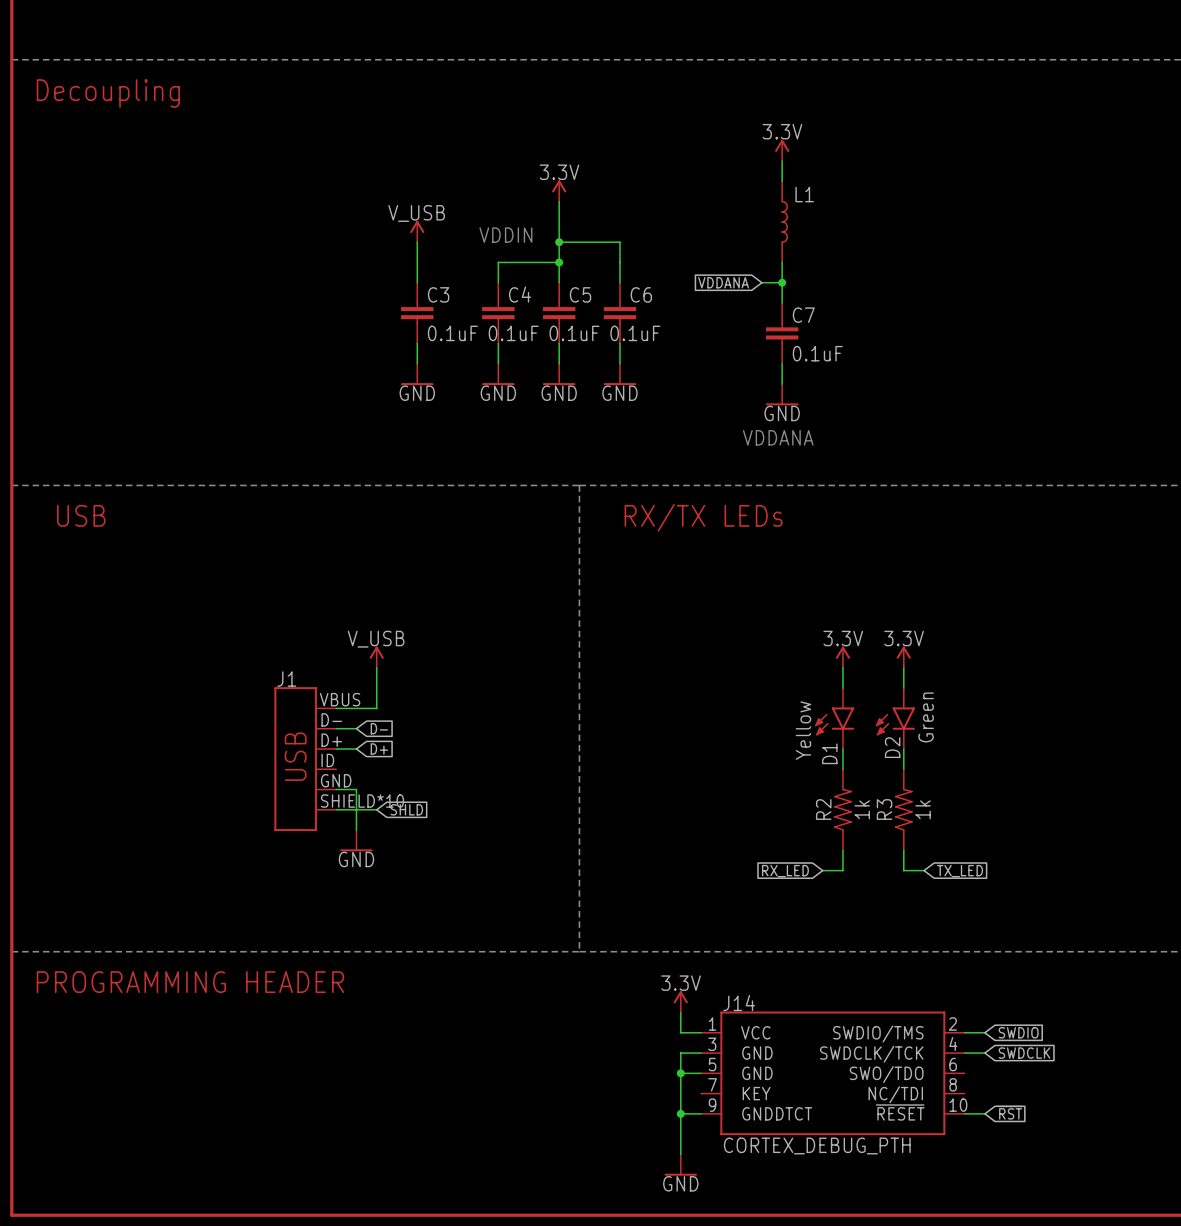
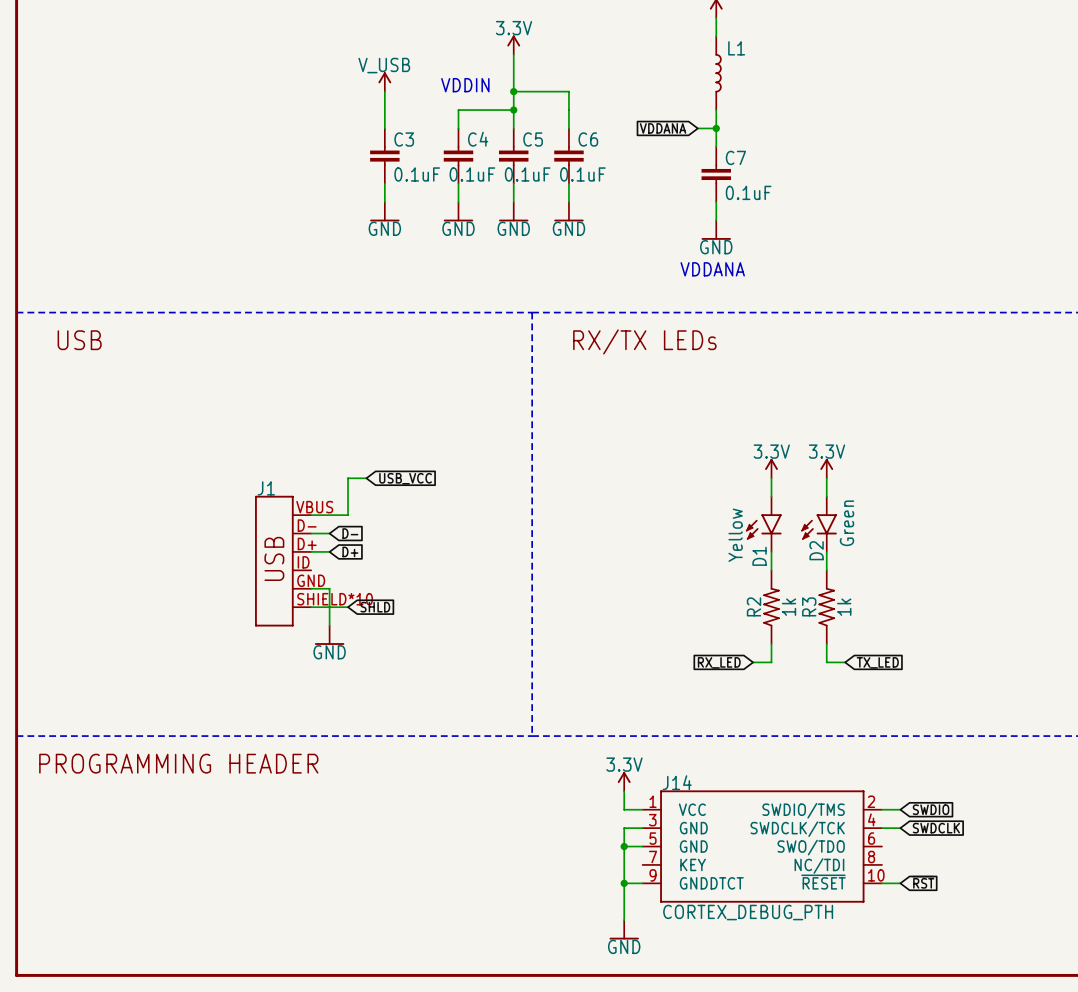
power symbol: V_USB (376, 657) -> none
wire: none -> (348, 478) (366, 478)
global label: none -> USB_VCC (405, 478)

